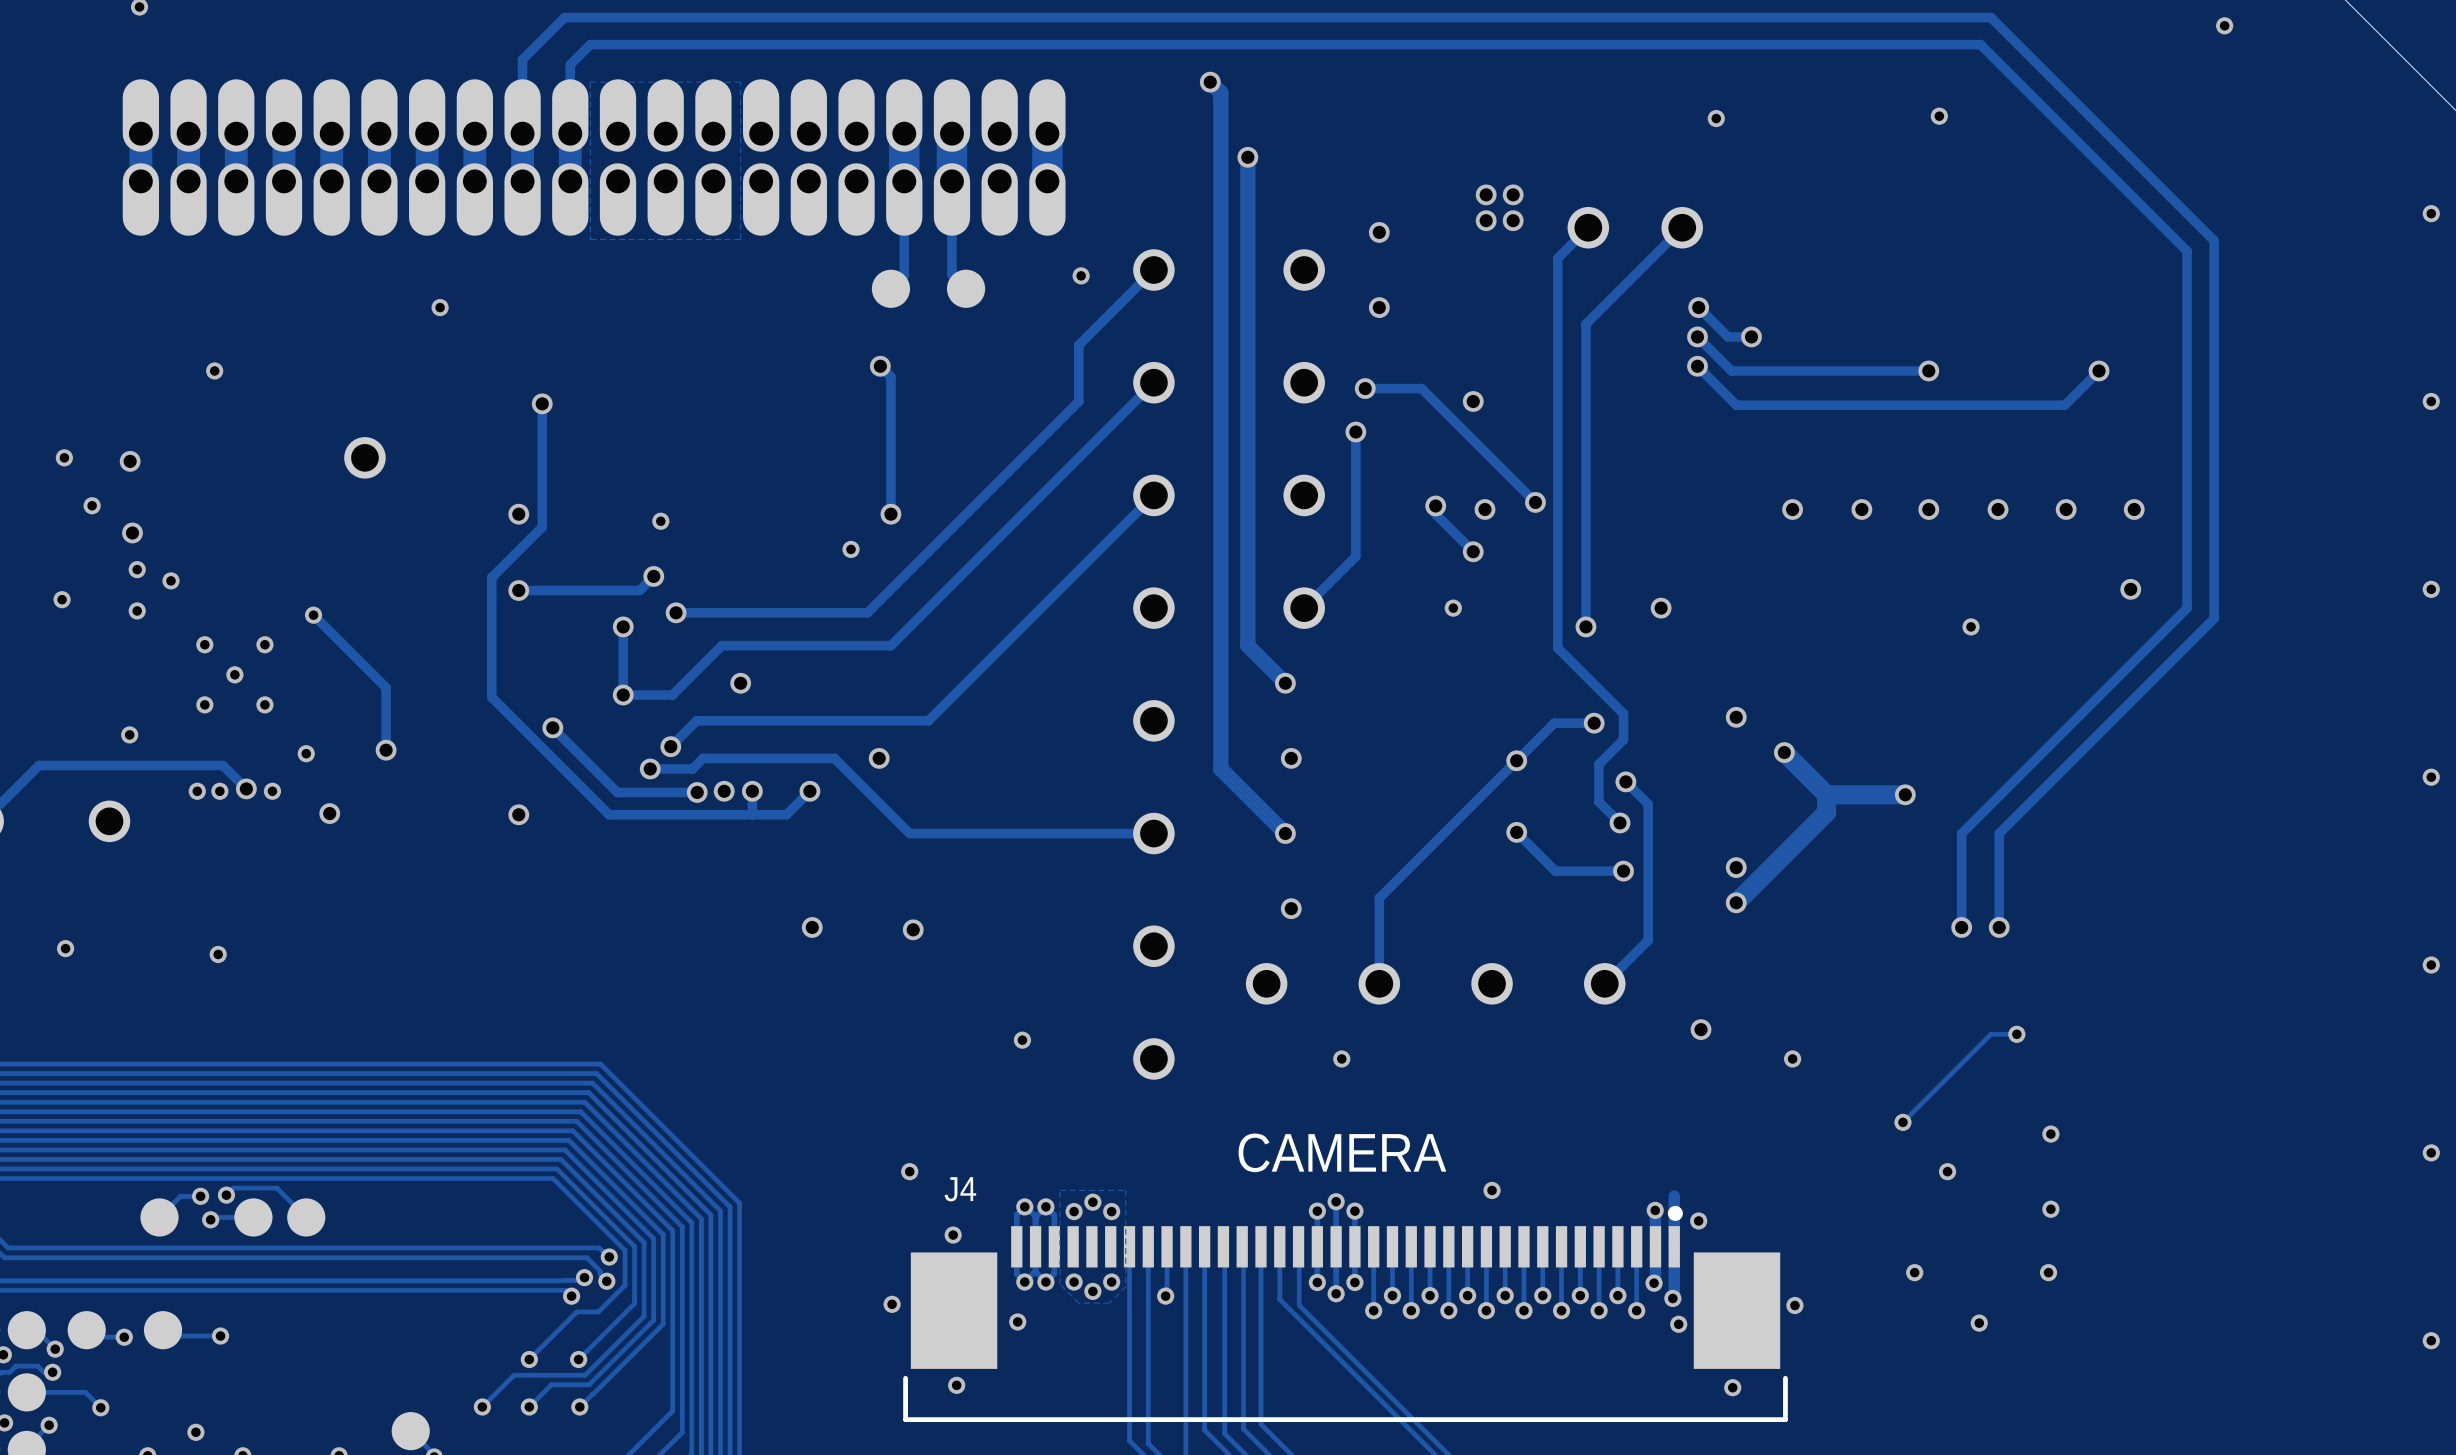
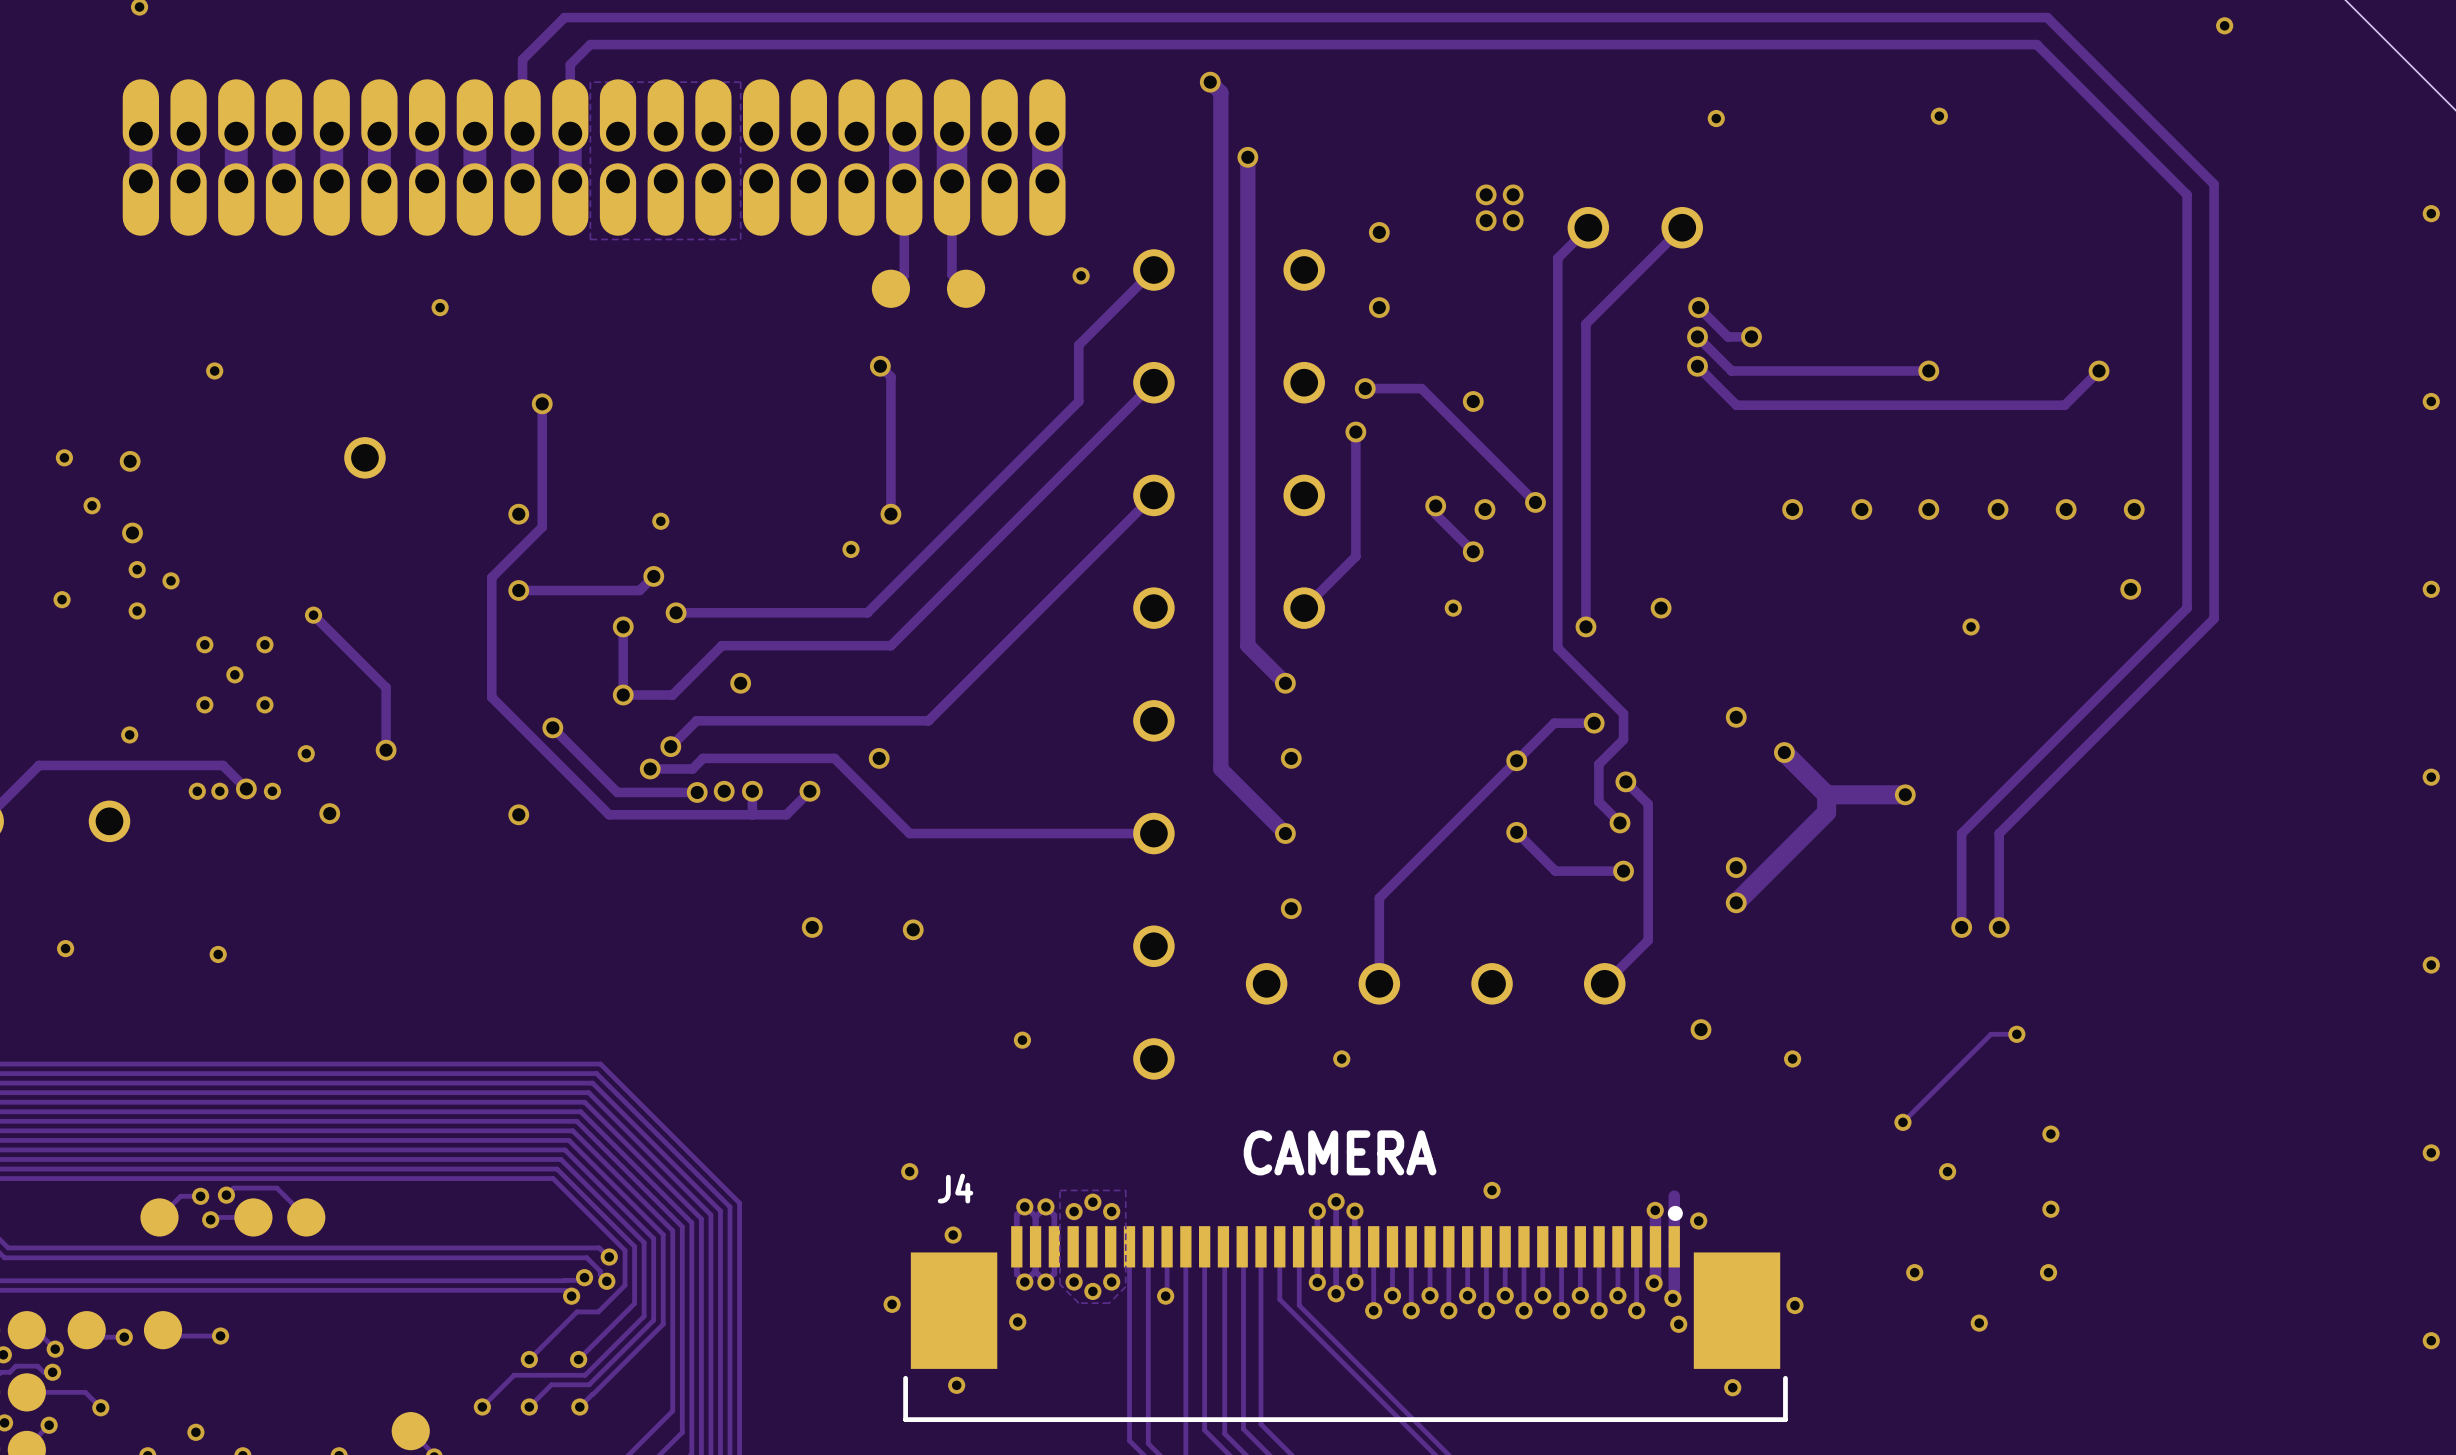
track: (1991, 17) (2214, 240) -> (1991, 17) (2047, 17) (2214, 184) (2214, 240)
track: (1980, 44) (2187, 251) -> (1980, 44) (2036, 44) (2187, 194) (2187, 251)

